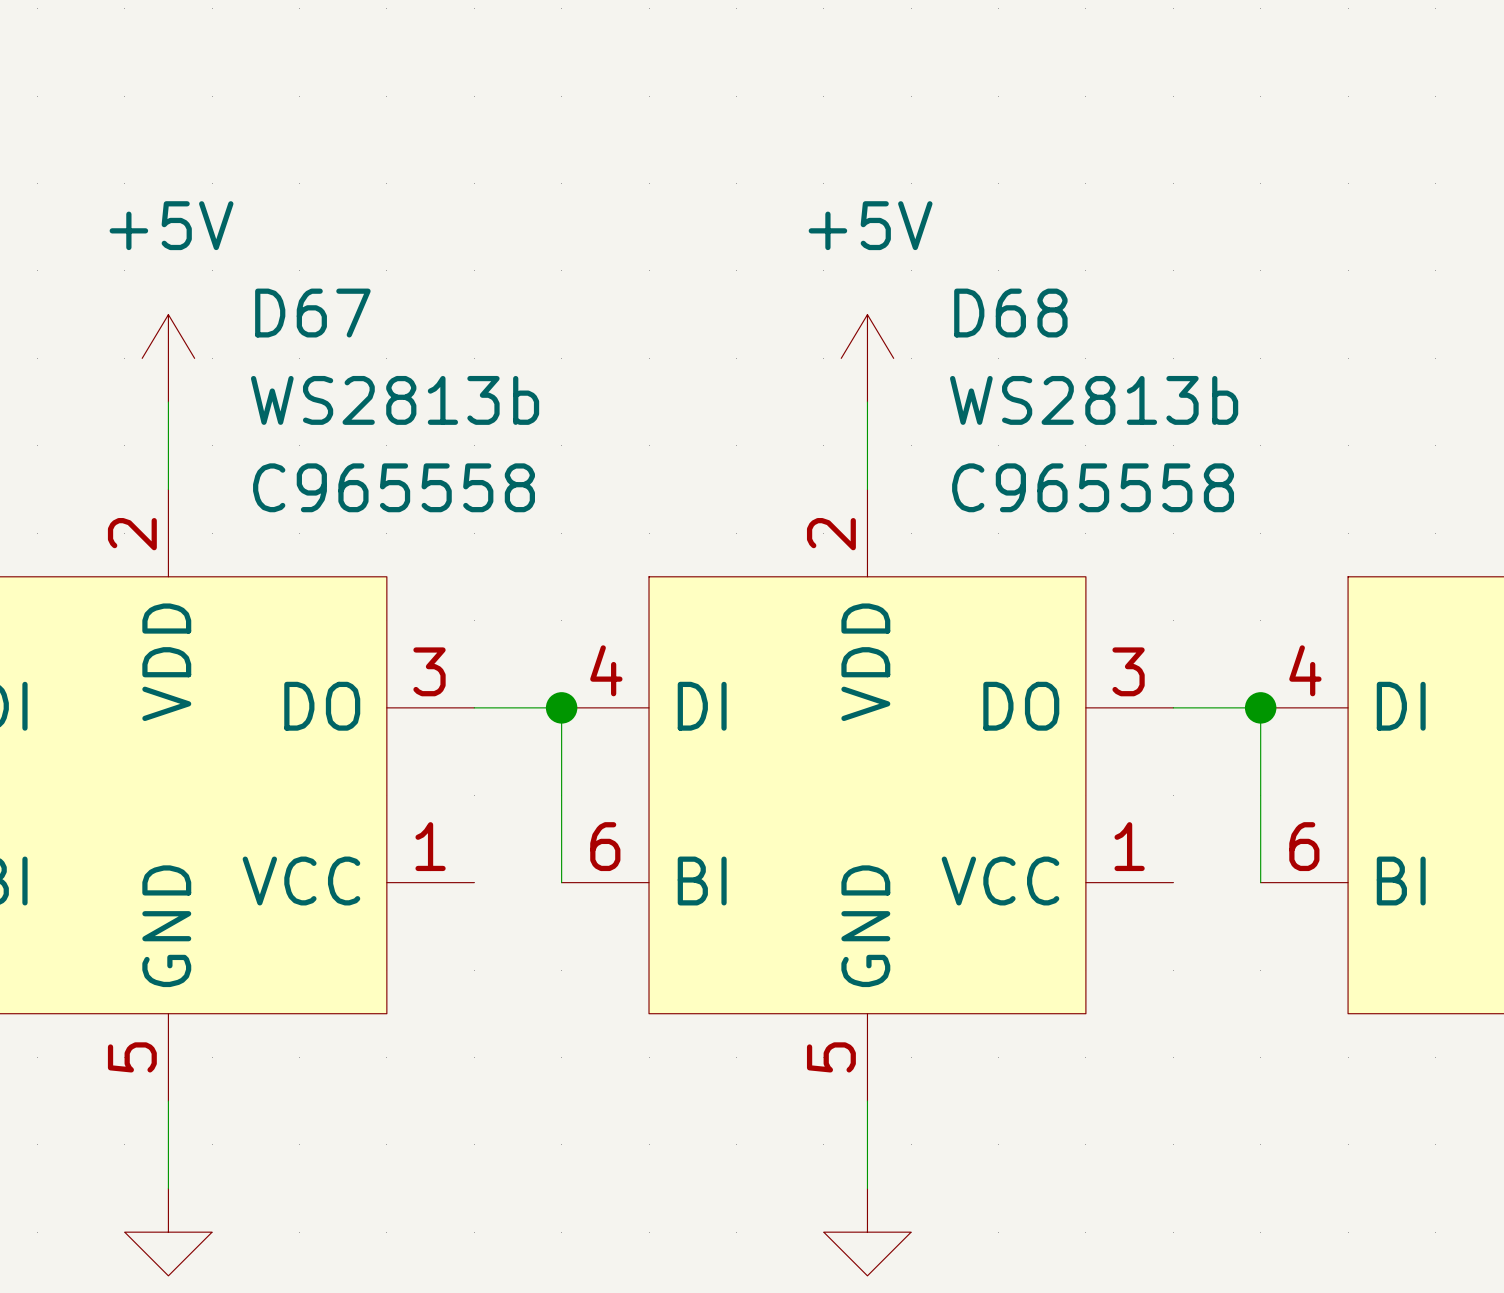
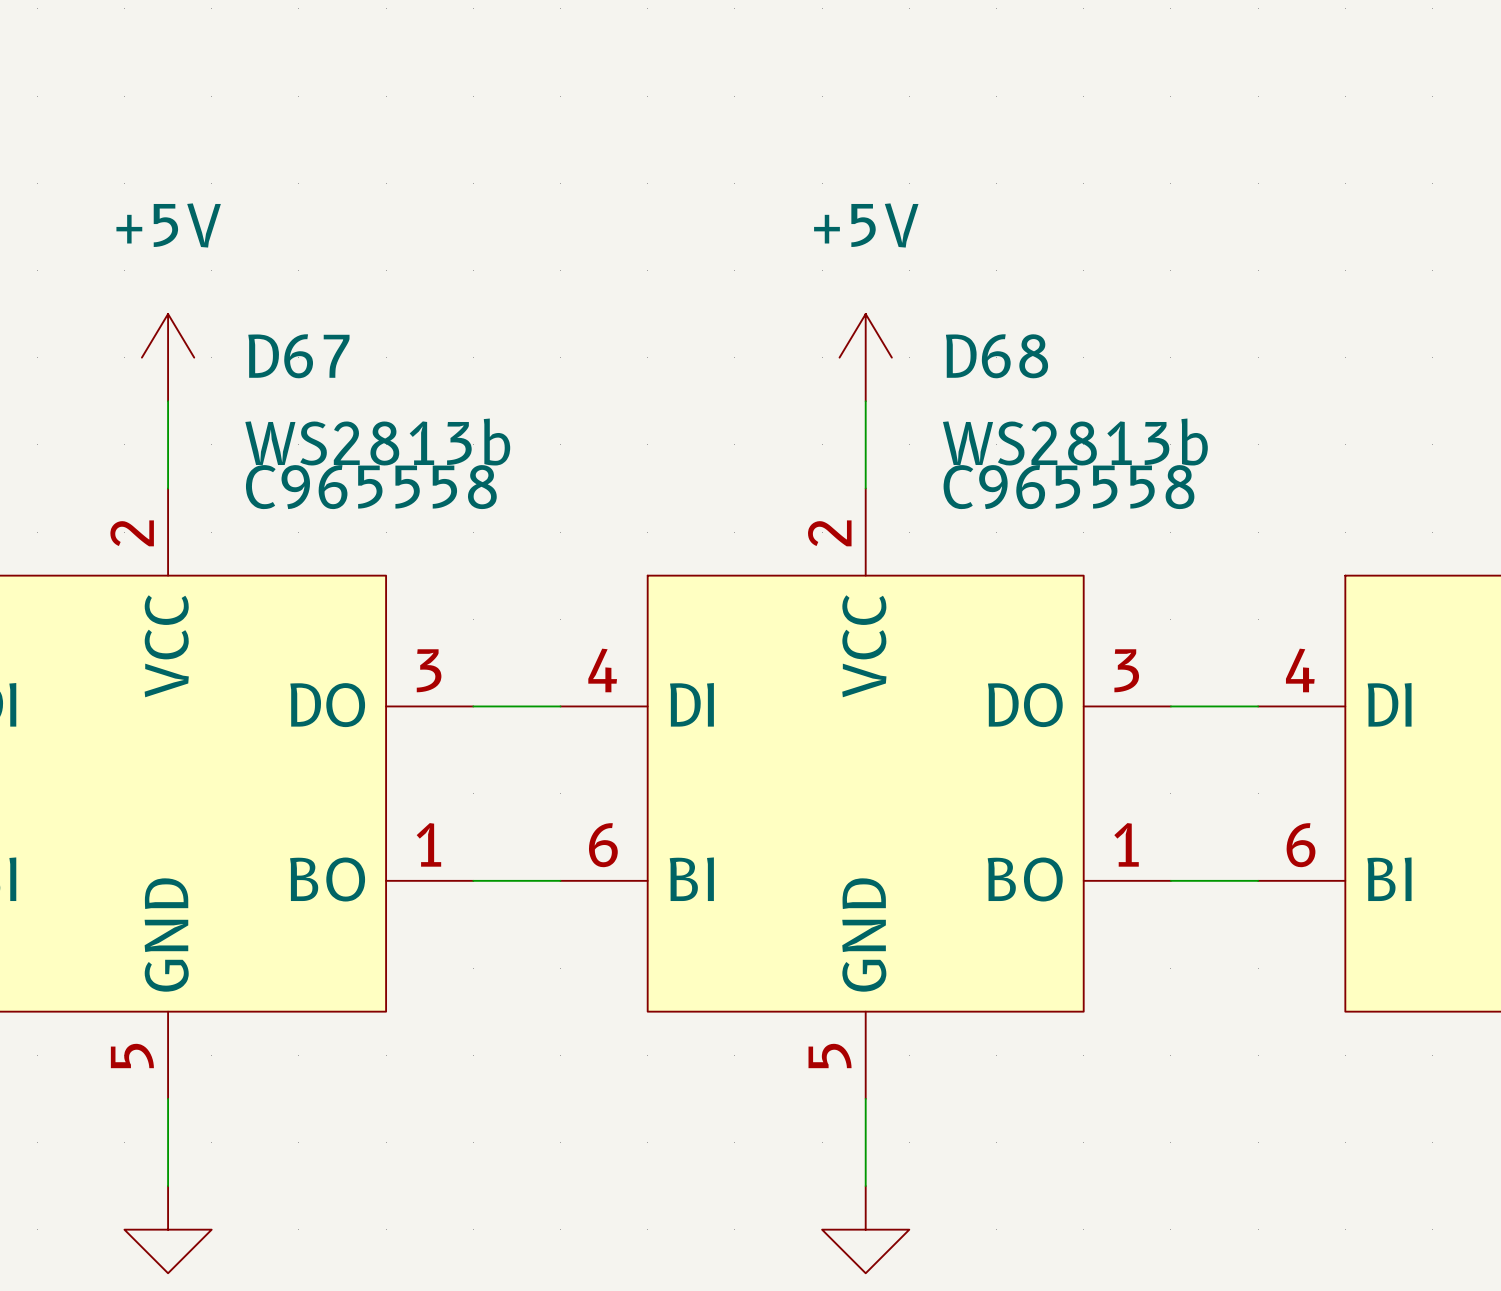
D67 name position: D67 (312, 313) -> D67 (298, 356)
D68 name position: D68 (1010, 313) -> D68 (997, 356)
D67 value position: WS2813b (395, 400) -> WS2813b (377, 442)
D68 value position: WS2813b (1094, 400) -> WS2813b (1075, 442)
D67 pin name: VDD (166, 662) -> VCC (166, 646)
D68 pin name: VDD (865, 662) -> VCC (864, 646)
wire: (561, 707) (561, 882) -> (473, 880) (560, 880)
junction: (561, 707) -> none
wire: (1260, 707) (1260, 882) -> (1170, 880) (1258, 880)
junction: (1260, 707) -> none
D67 pin name: VCC (301, 881) -> BO (327, 879)
D68 pin name: VCC (1000, 881) -> BO (1025, 879)

